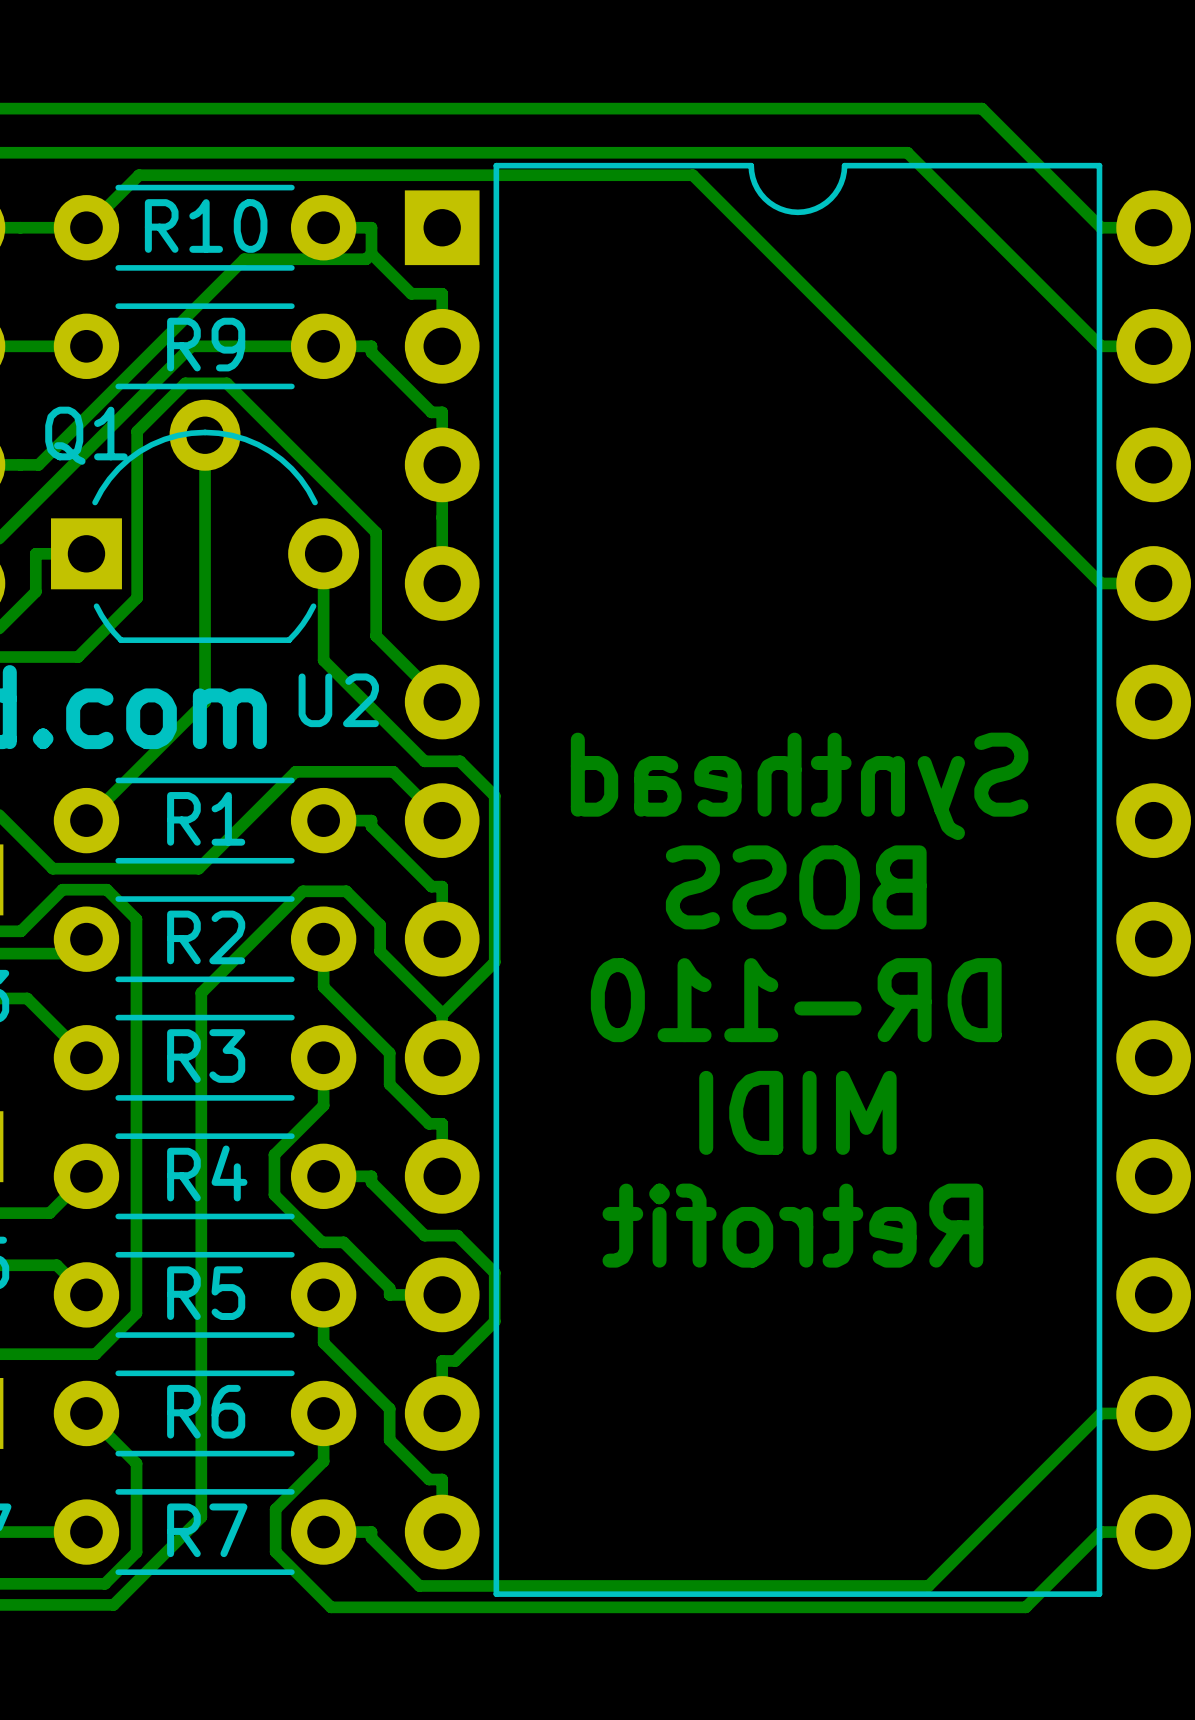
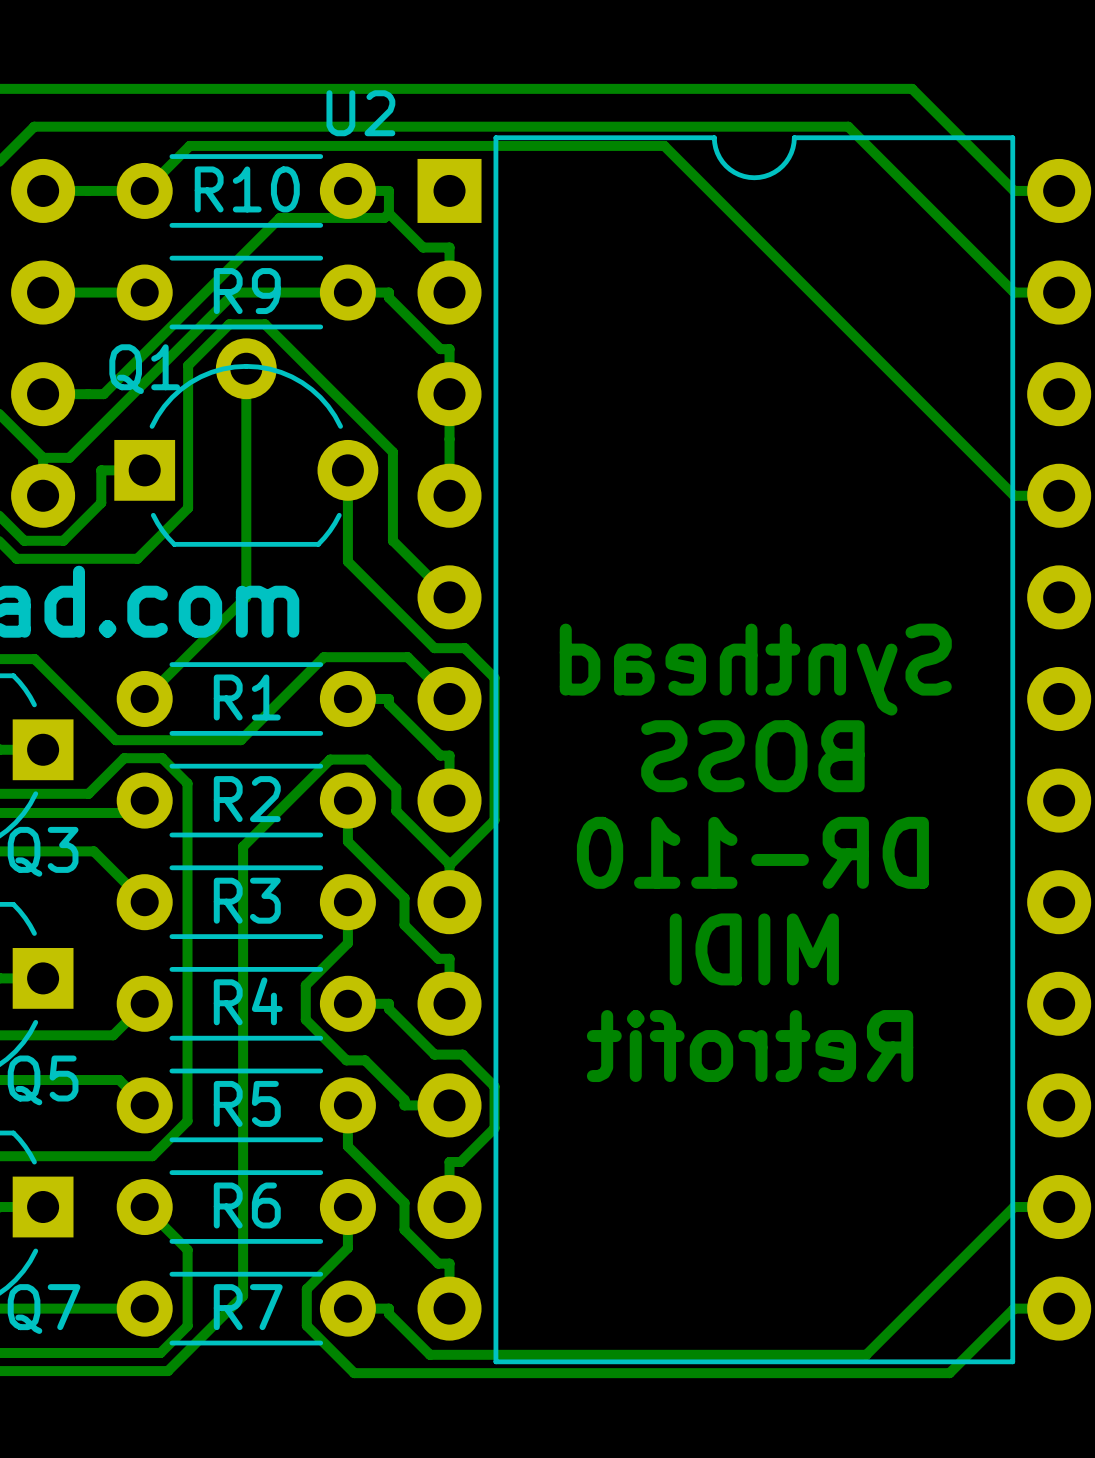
U2 name position: U2 (338, 700) -> U2 (360, 113)

